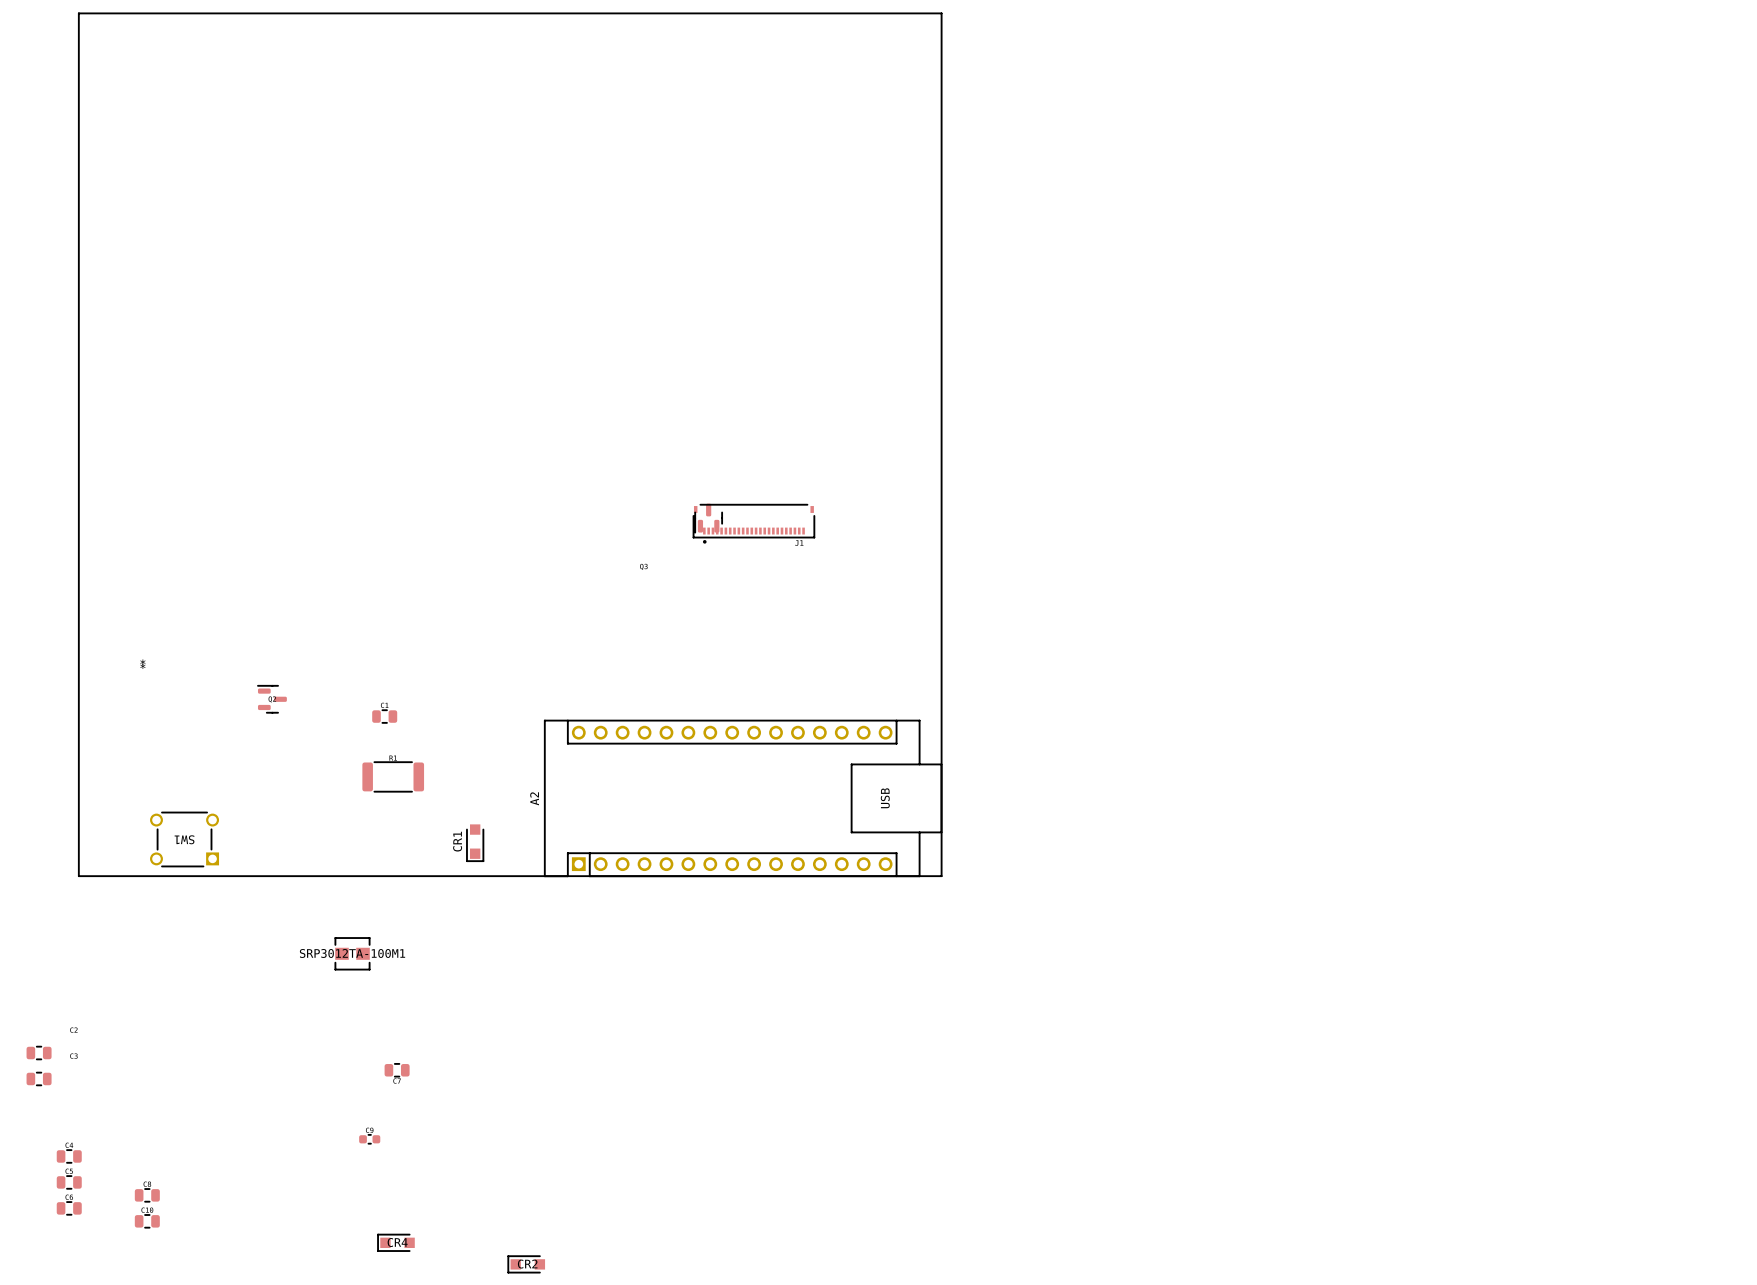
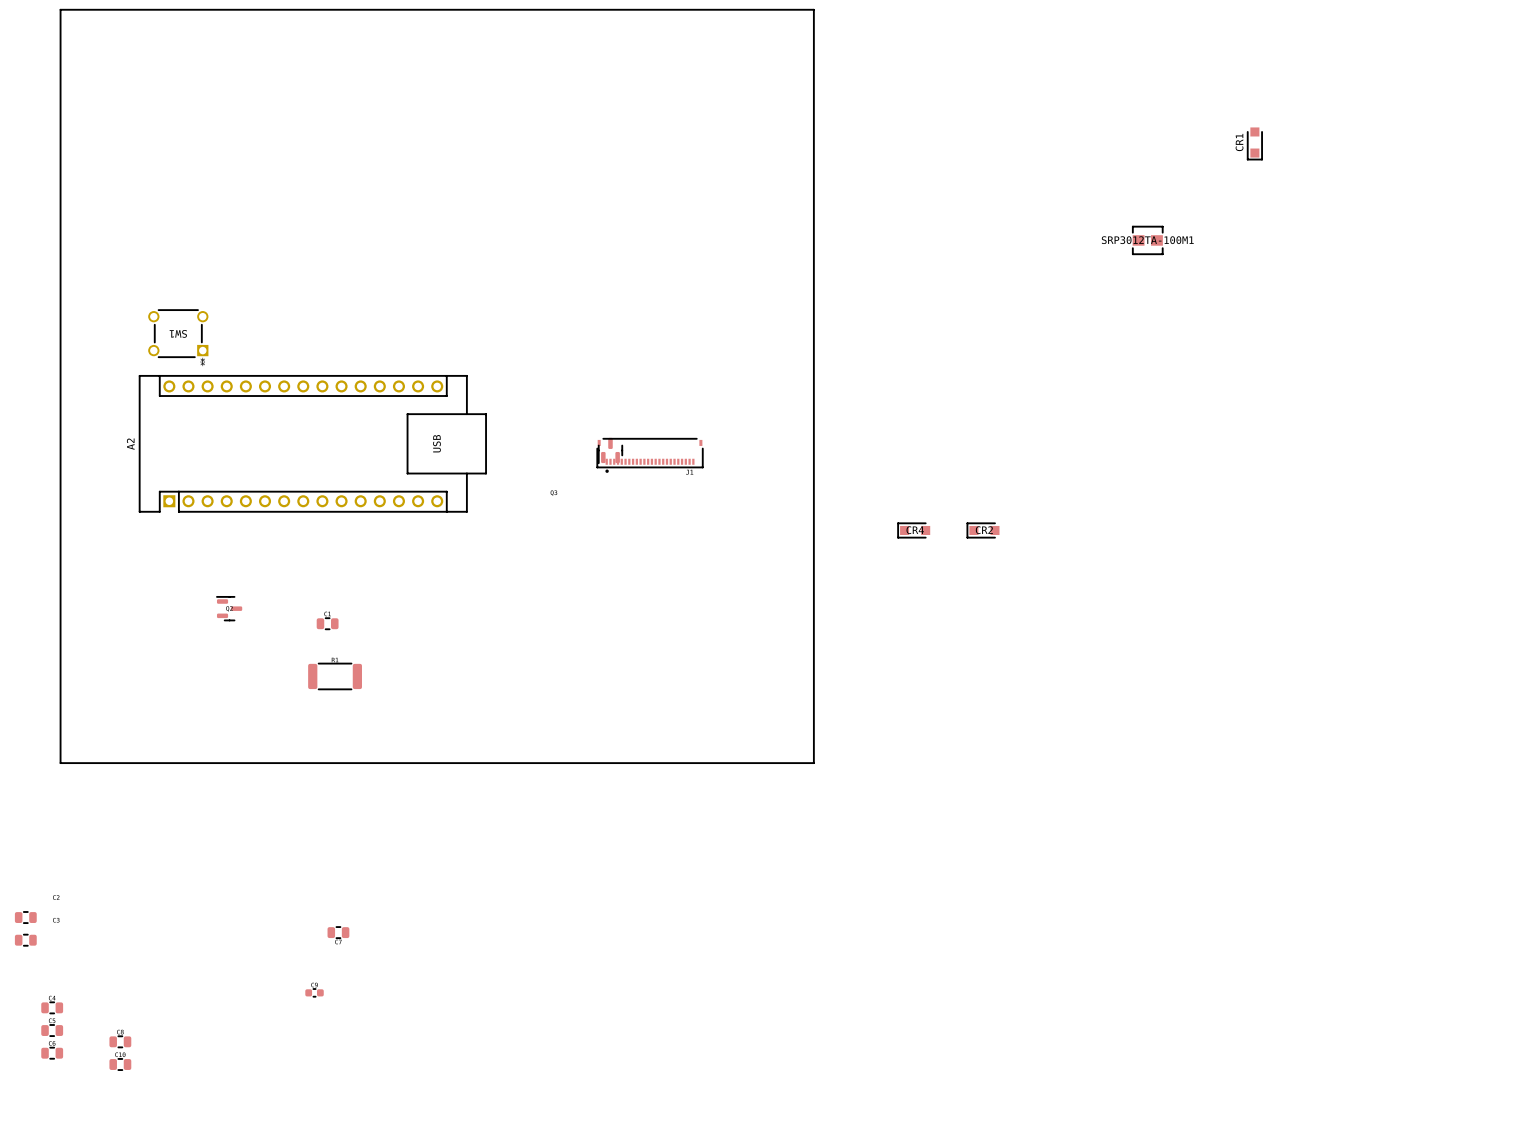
A2 position: (743, 798) -> (312, 443)
SW1 footprint: [150, 811, 220, 868] -> [148, 309, 209, 358]
CR1 position: (475, 843) -> (1254, 143)
SRP3012TA-100M1 position: (352, 953) -> (1147, 240)
CR4 position: (396, 1242) -> (913, 530)
CR2 position: (526, 1264) -> (983, 530)

